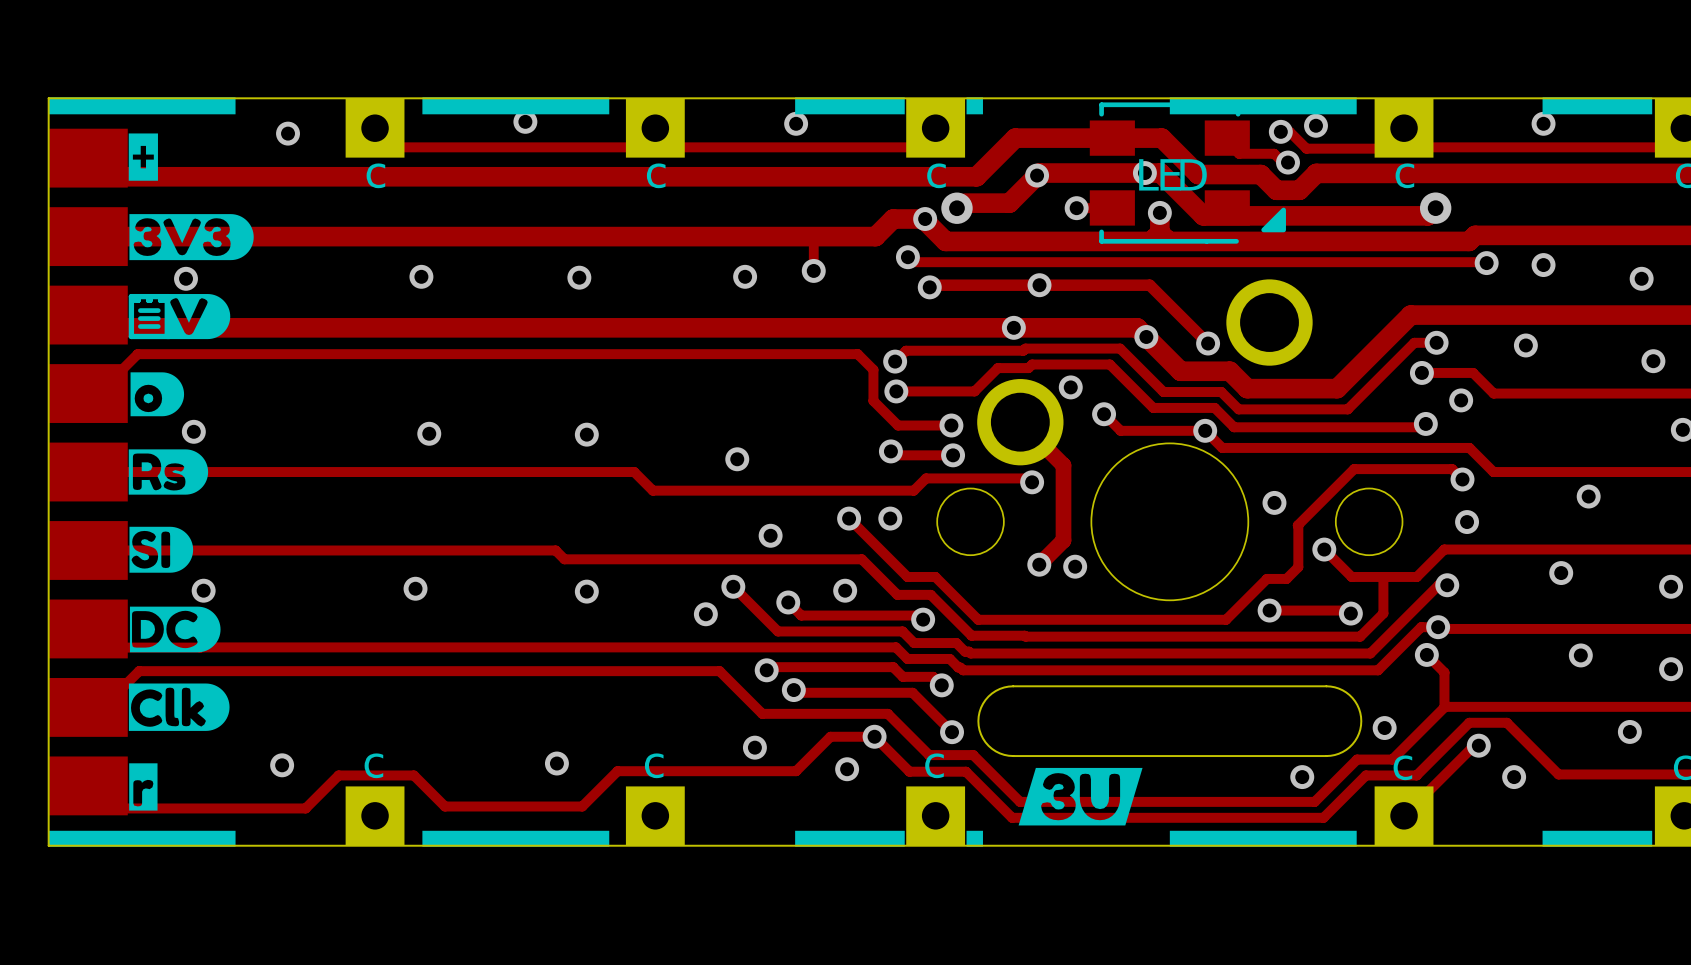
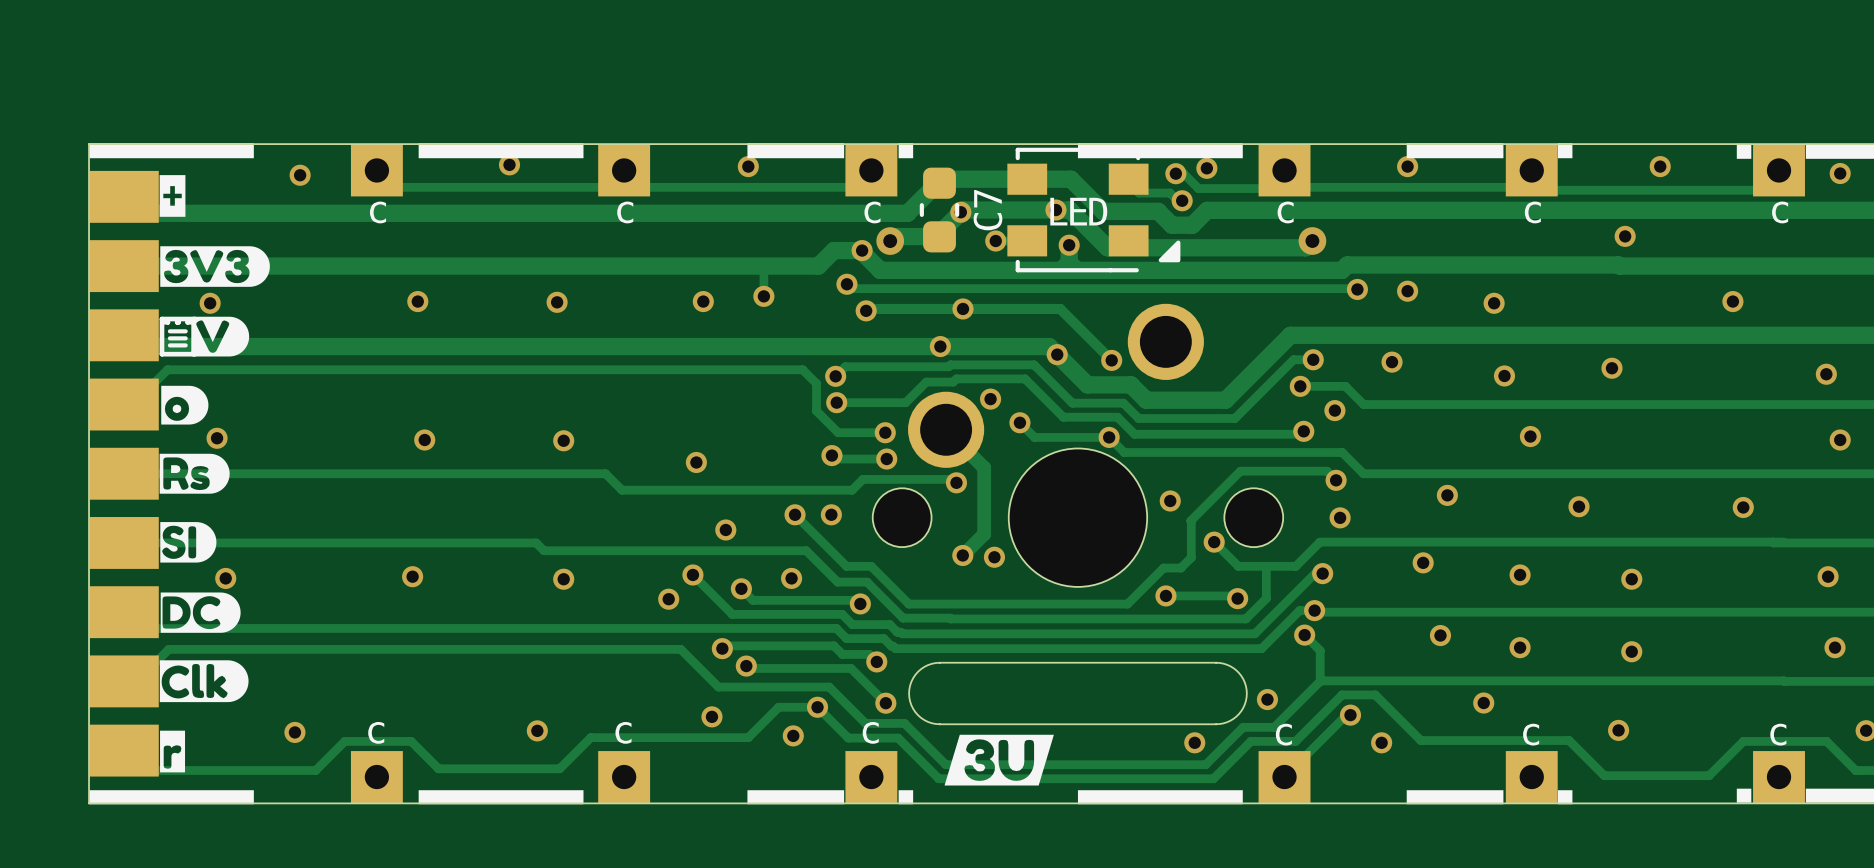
C7: none -> (939, 210)

